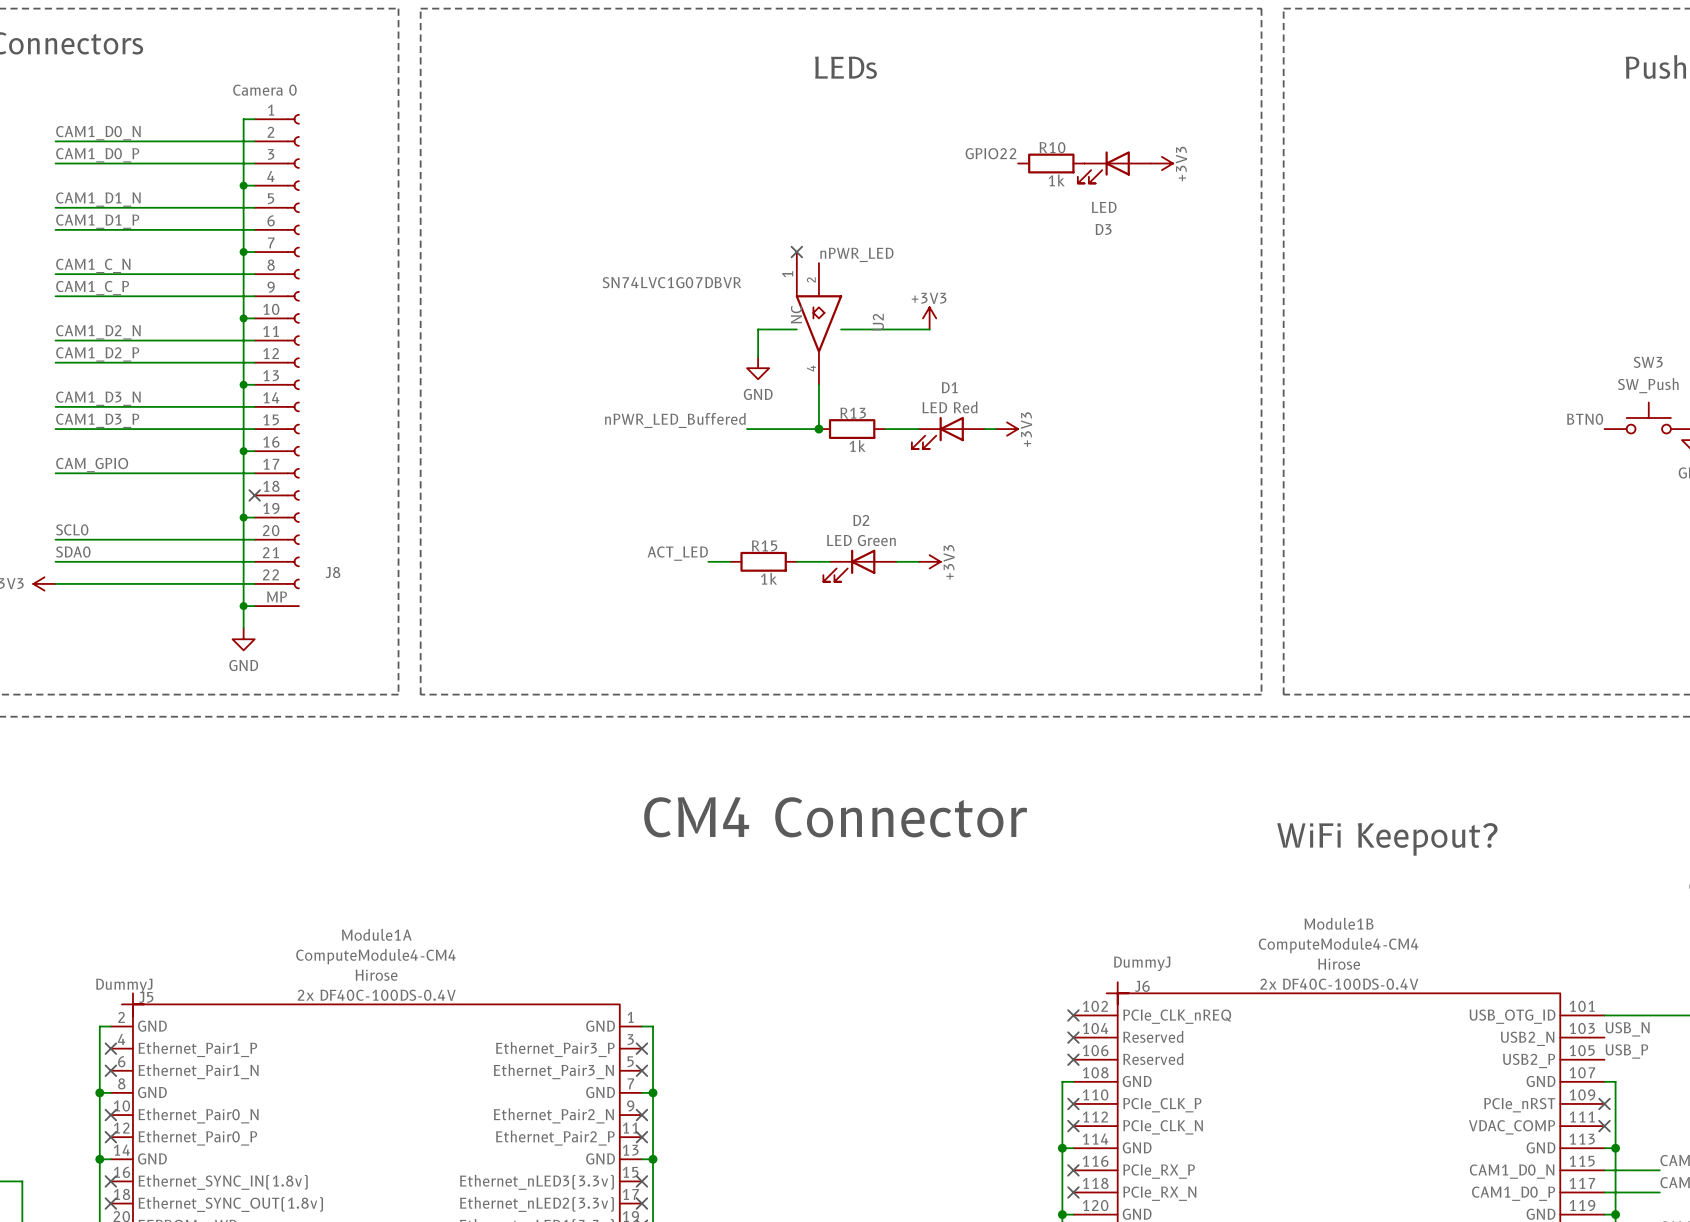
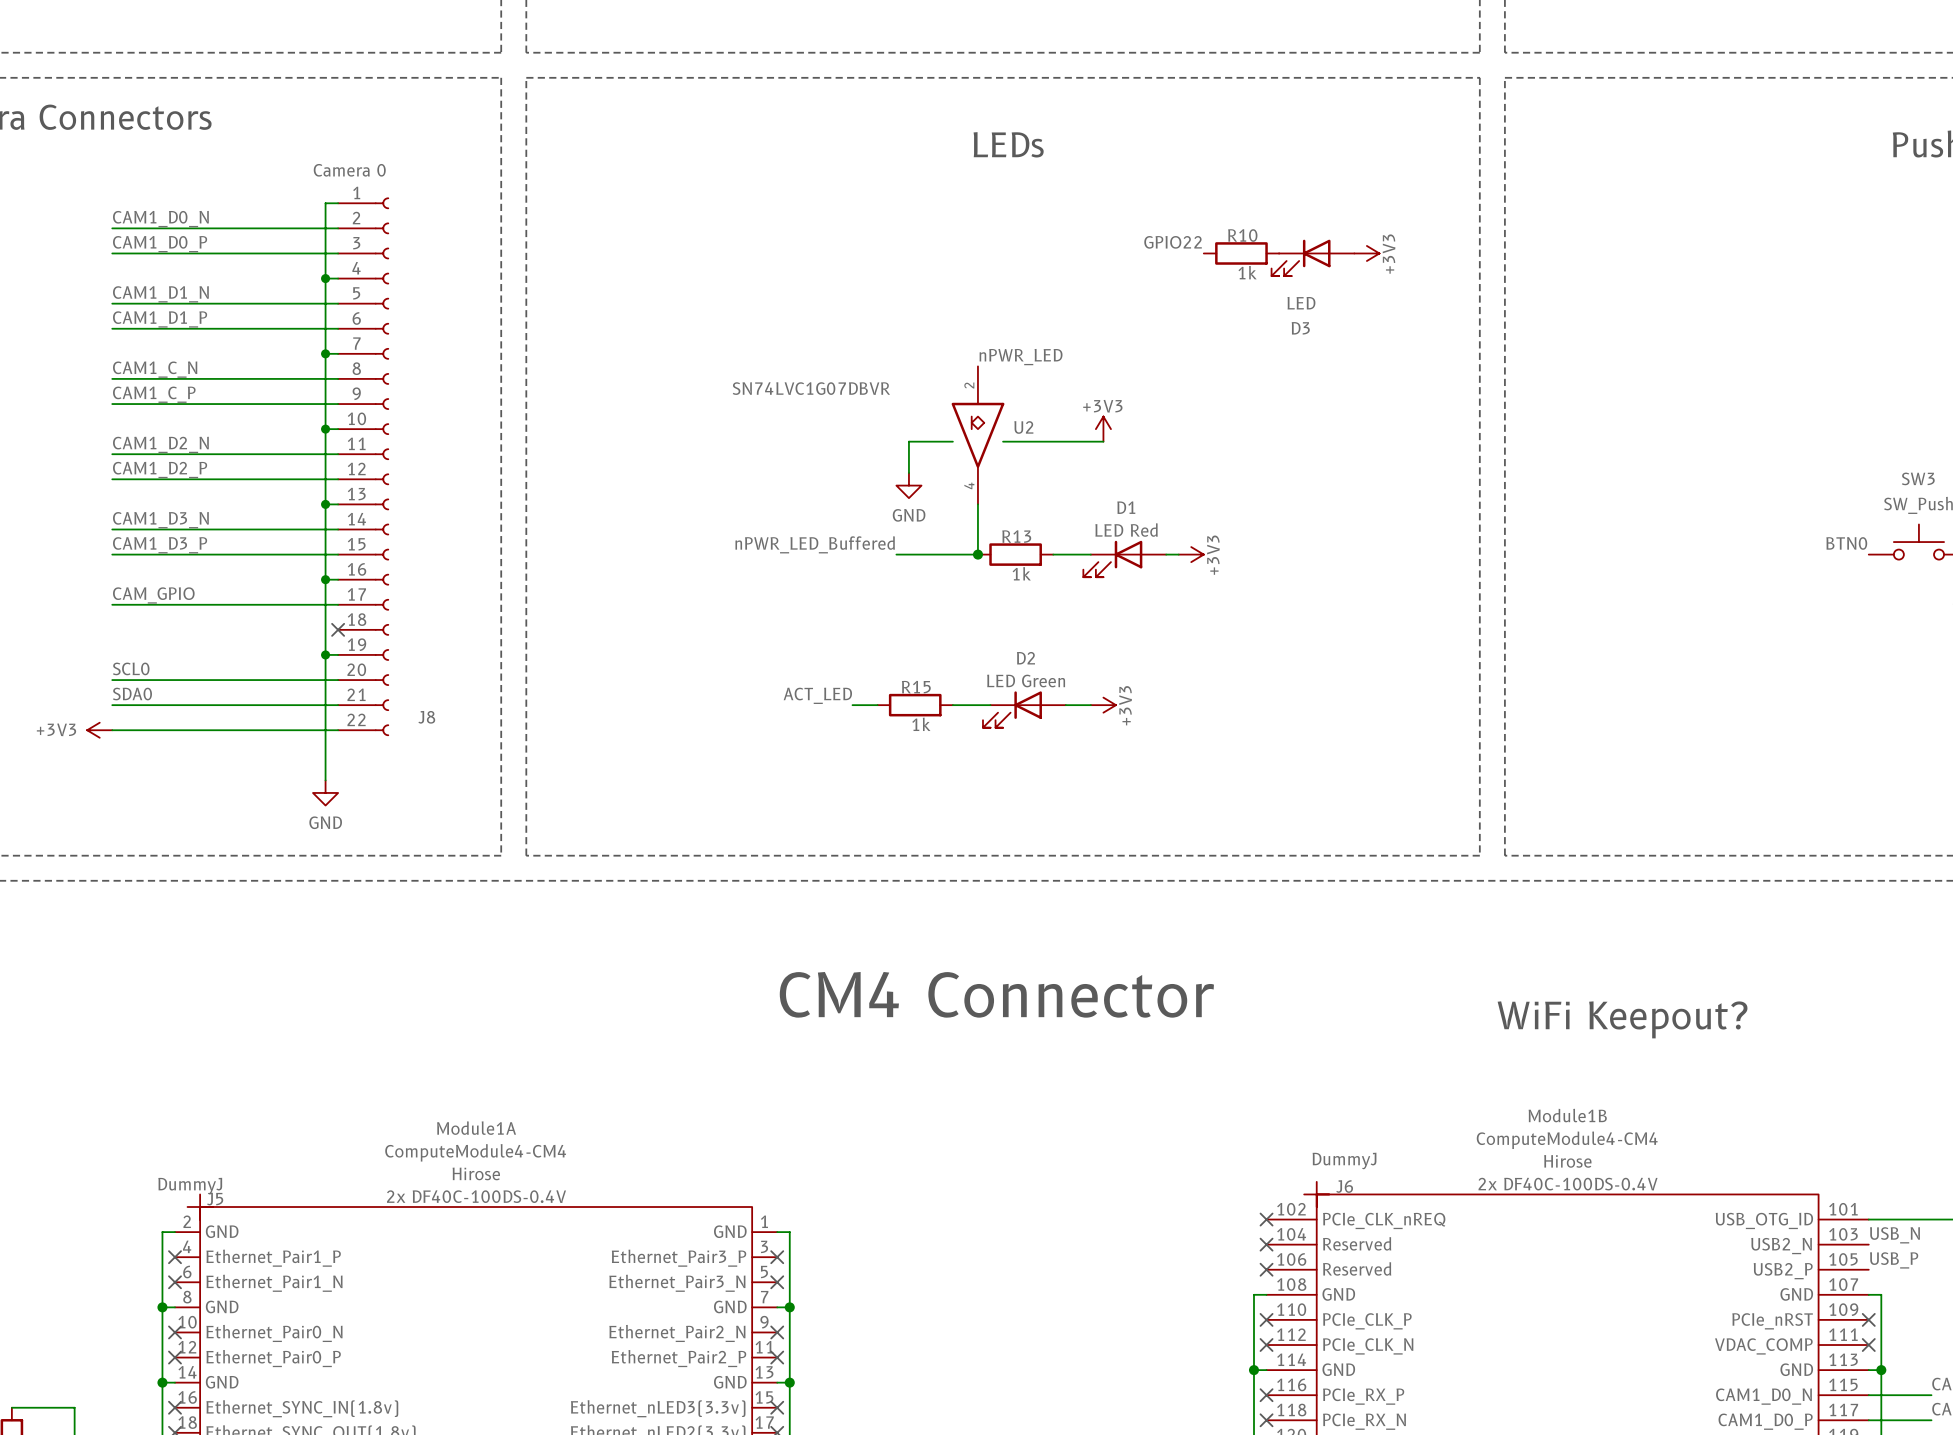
J8 symbol: [254, 114, 300, 607] -> [338, 197, 390, 737]
U2 symbol: [795, 252, 843, 385] -> [951, 366, 1005, 505]
no-connect mark: (796, 252) -> none
wire: (243, 606) (254, 606) -> none
junction: (243, 606) -> none

